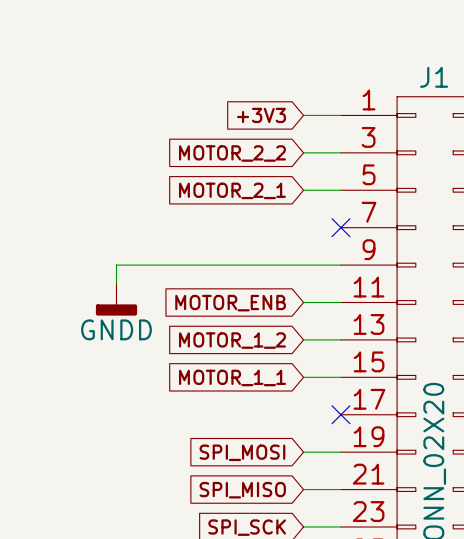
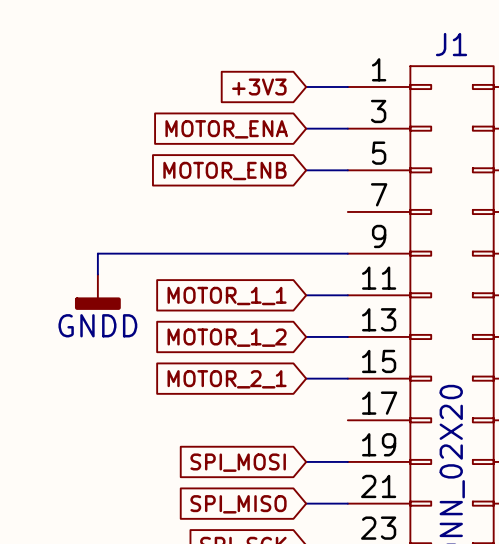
global label: MOTOR_2_2 (232, 153) -> MOTOR_ENA (226, 129)
global label: MOTOR_2_1 (232, 190) -> MOTOR_ENB (224, 171)
no-connect mark: (340, 227) -> none
global label: MOTOR_ENB (230, 303) -> MOTOR_1_1 (227, 296)
global label: MOTOR_1_1 (232, 377) -> MOTOR_2_1 (227, 379)
no-connect mark: (340, 414) -> none

